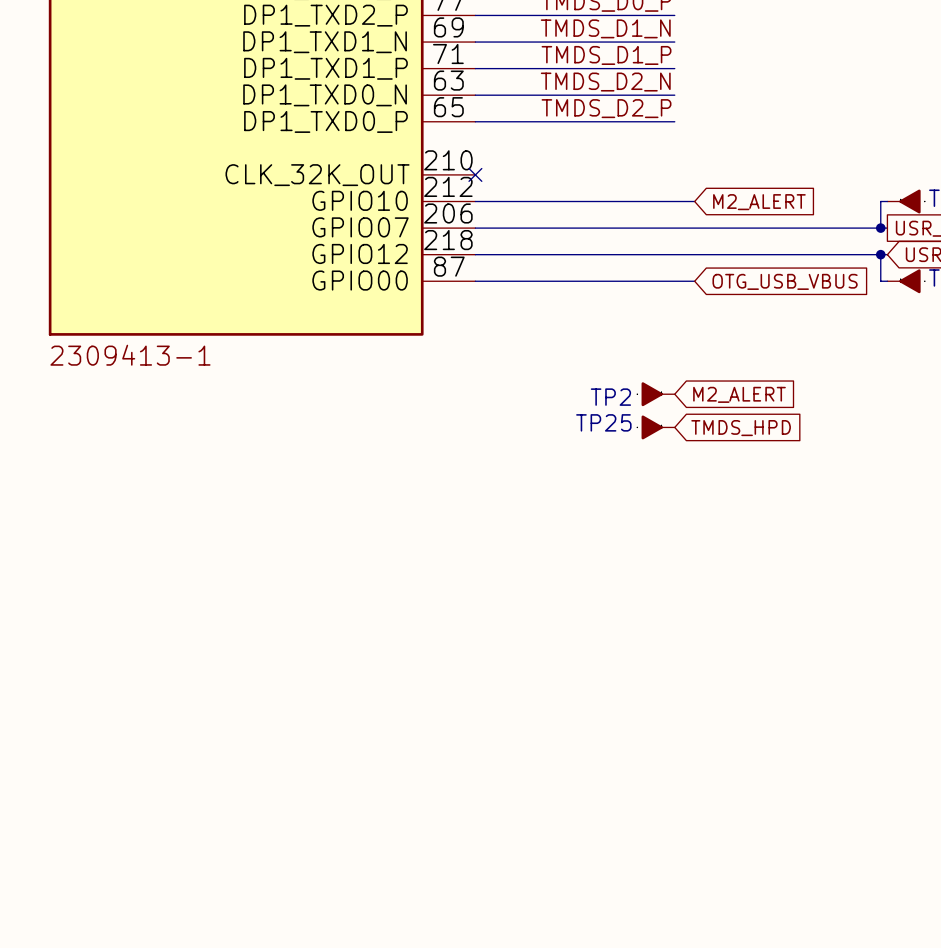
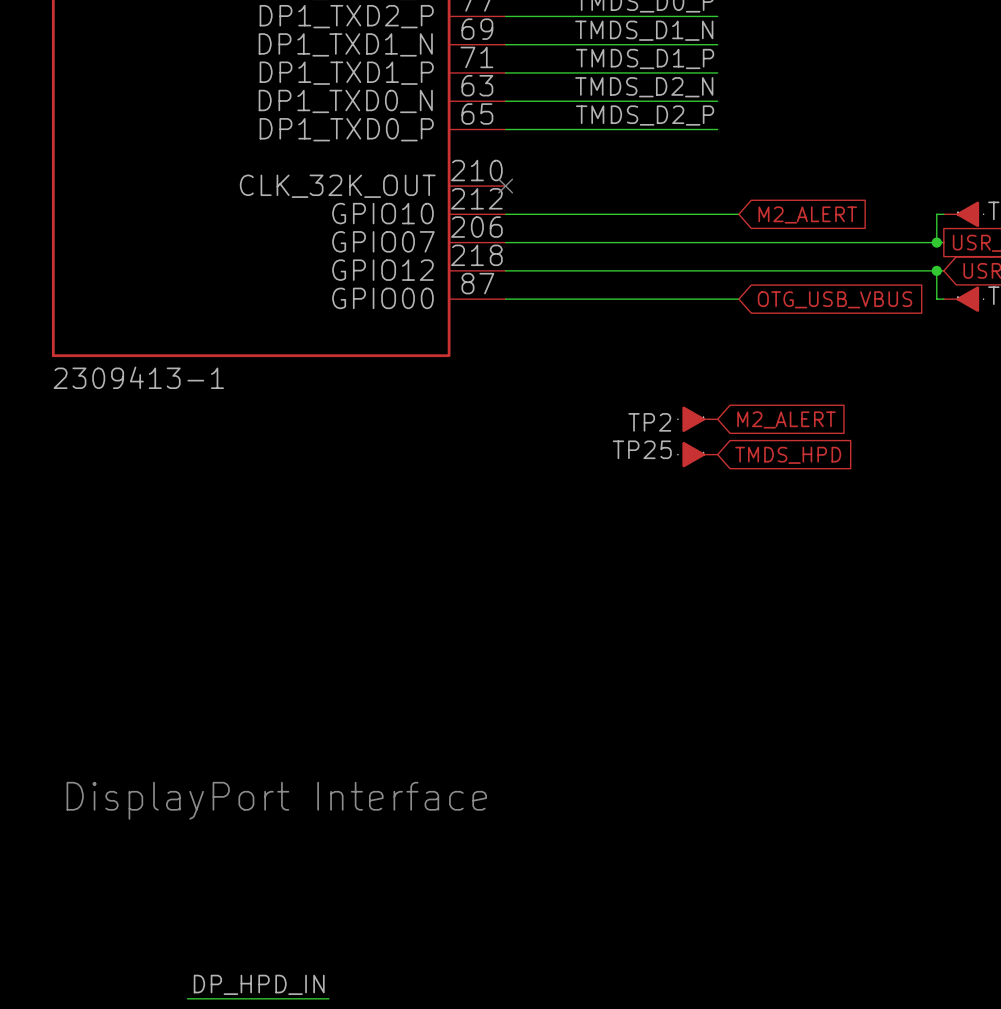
text: none -> DisplayPort Interface (276, 800)
label: none -> DP_HPD_IN (259, 984)
wire: none -> (187, 998) (328, 998)

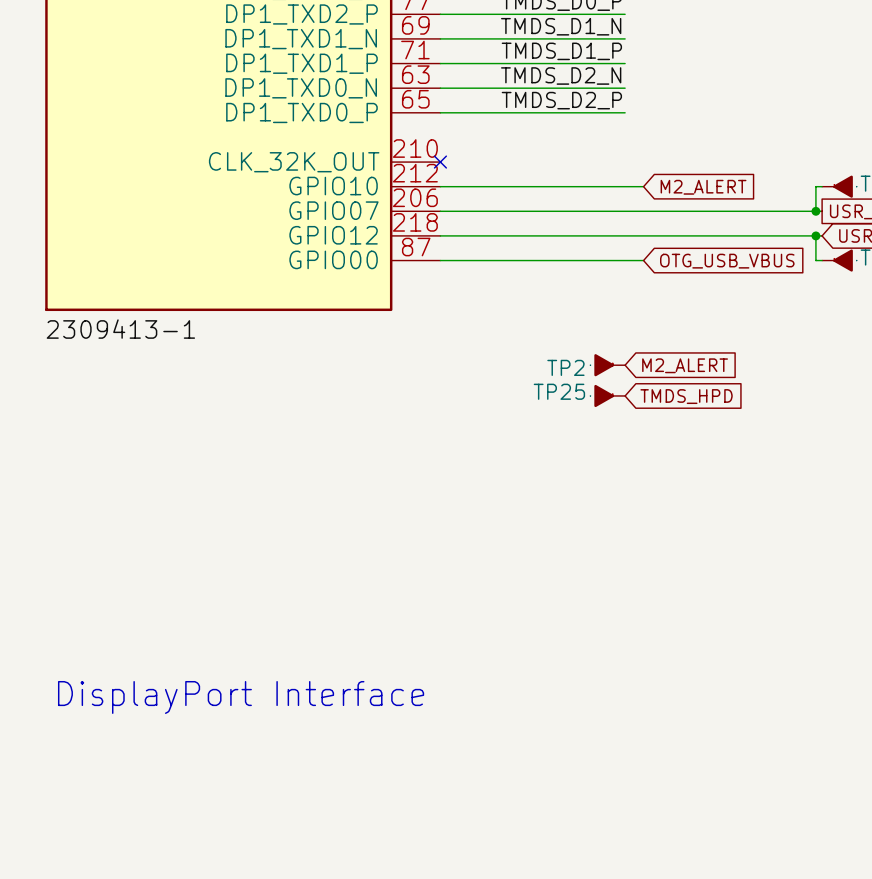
label: DP_HPD_IN (259, 984) -> none
wire: (187, 998) (328, 998) -> none

